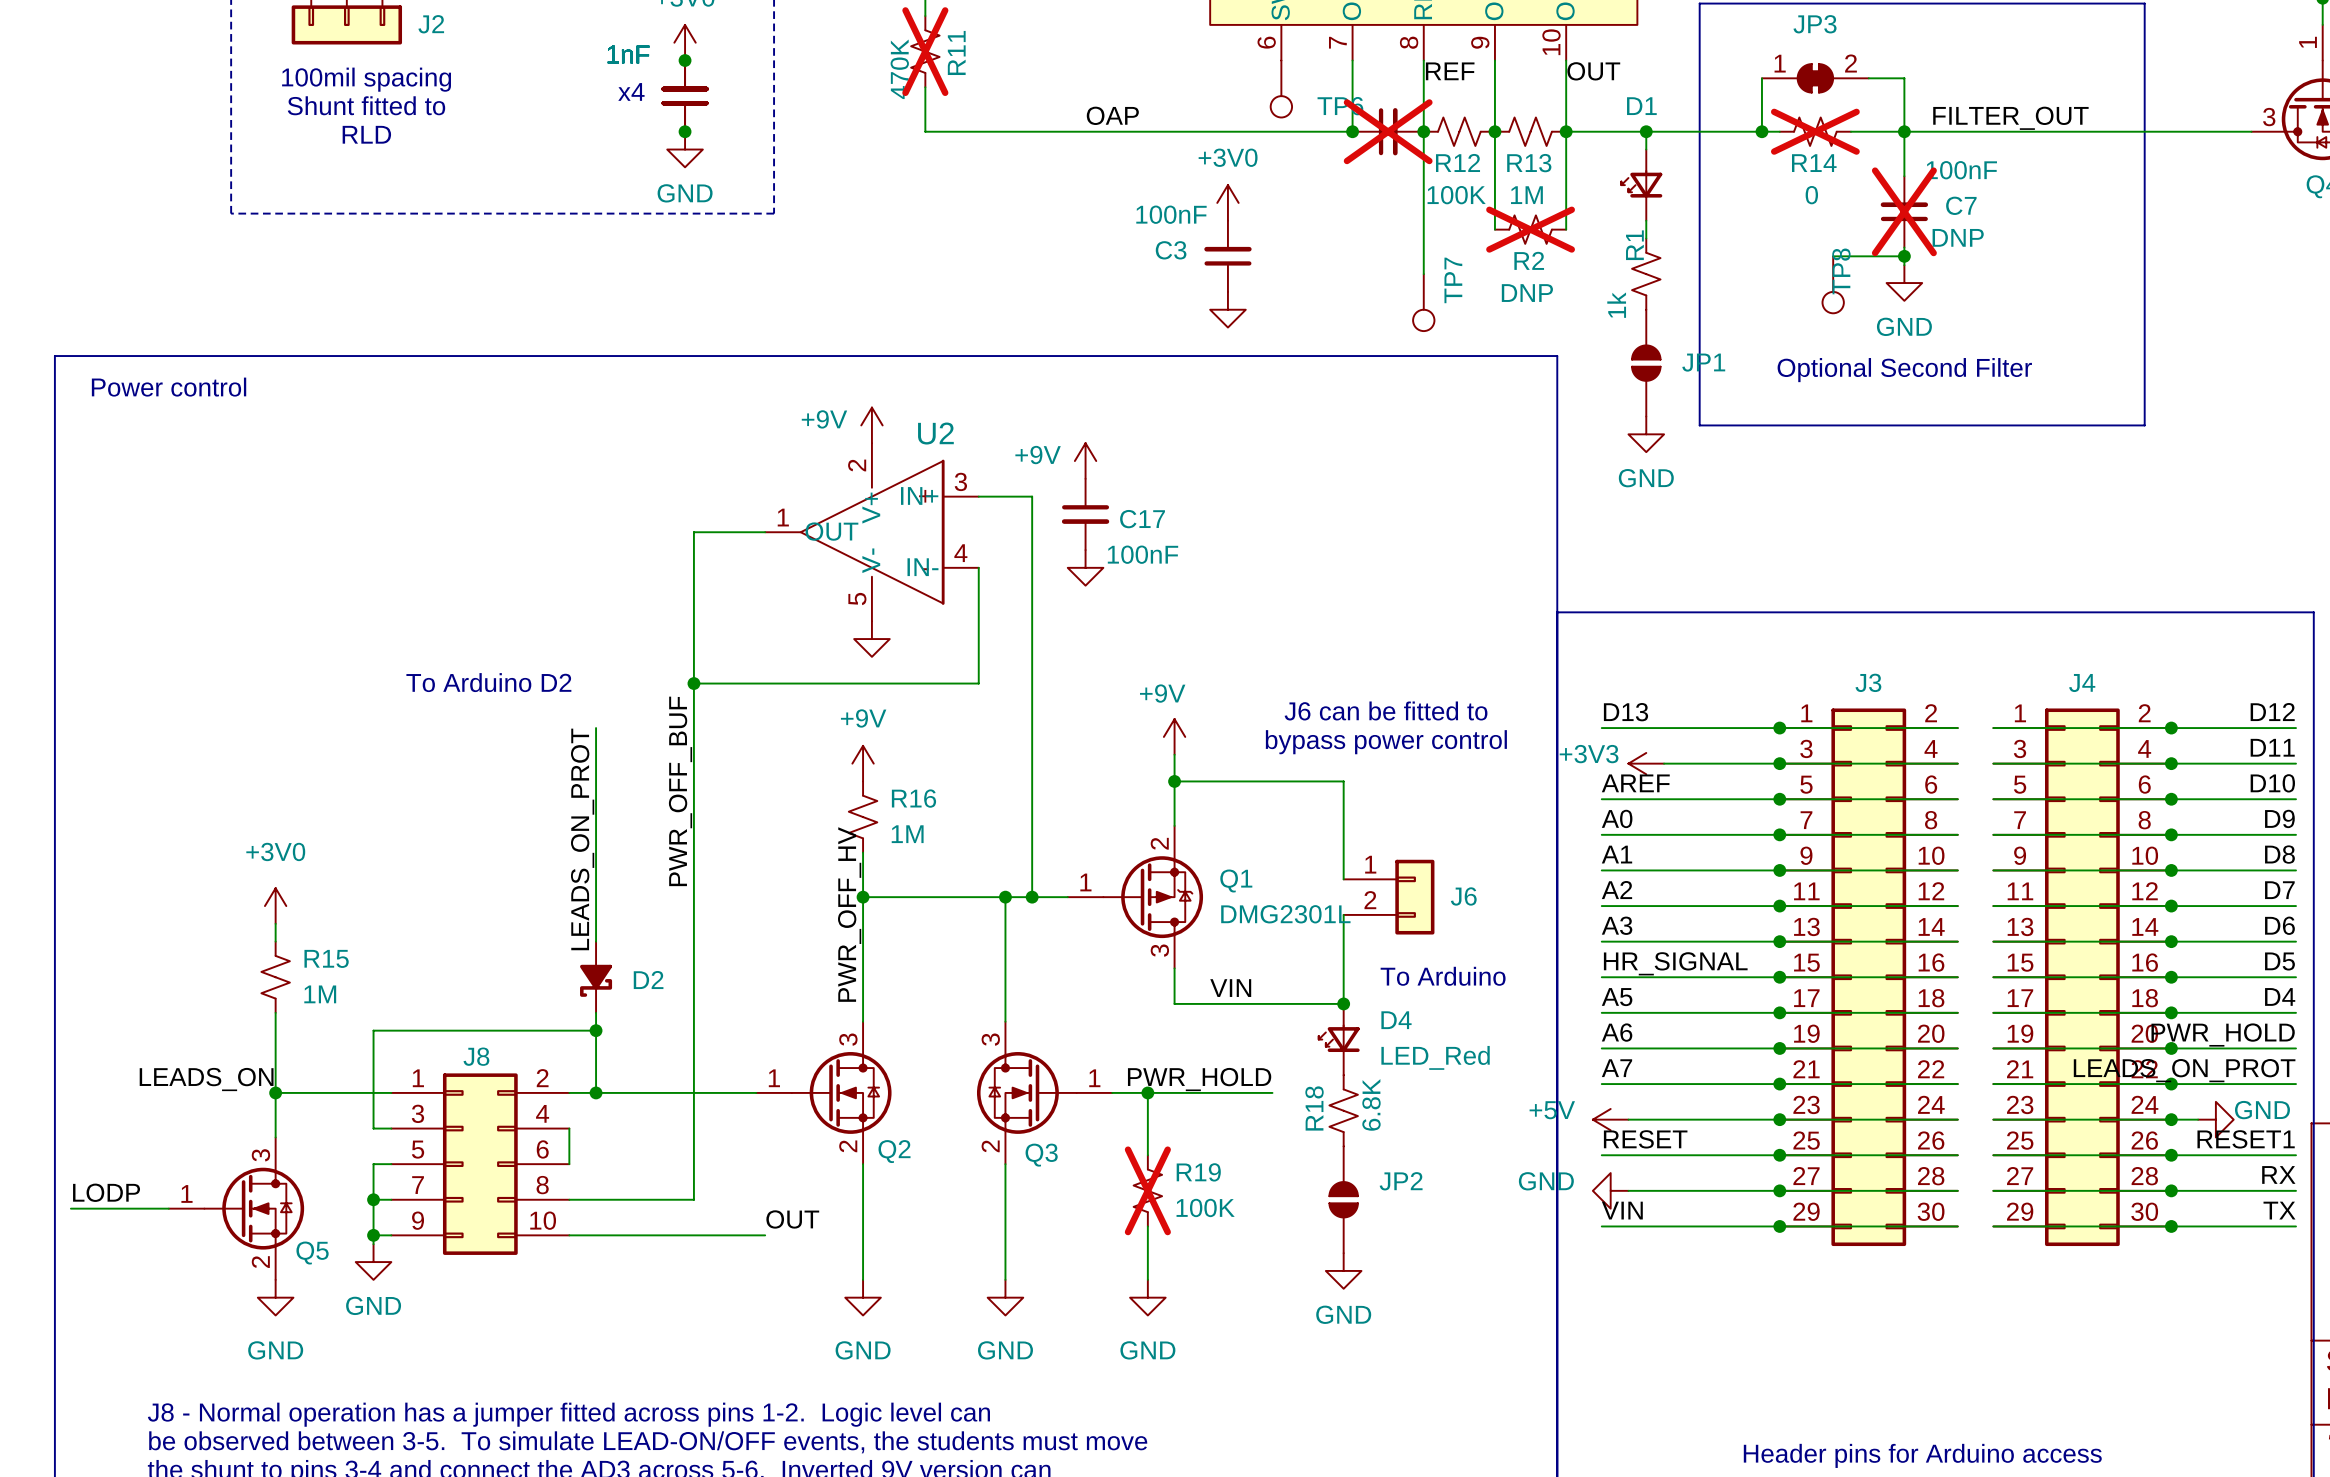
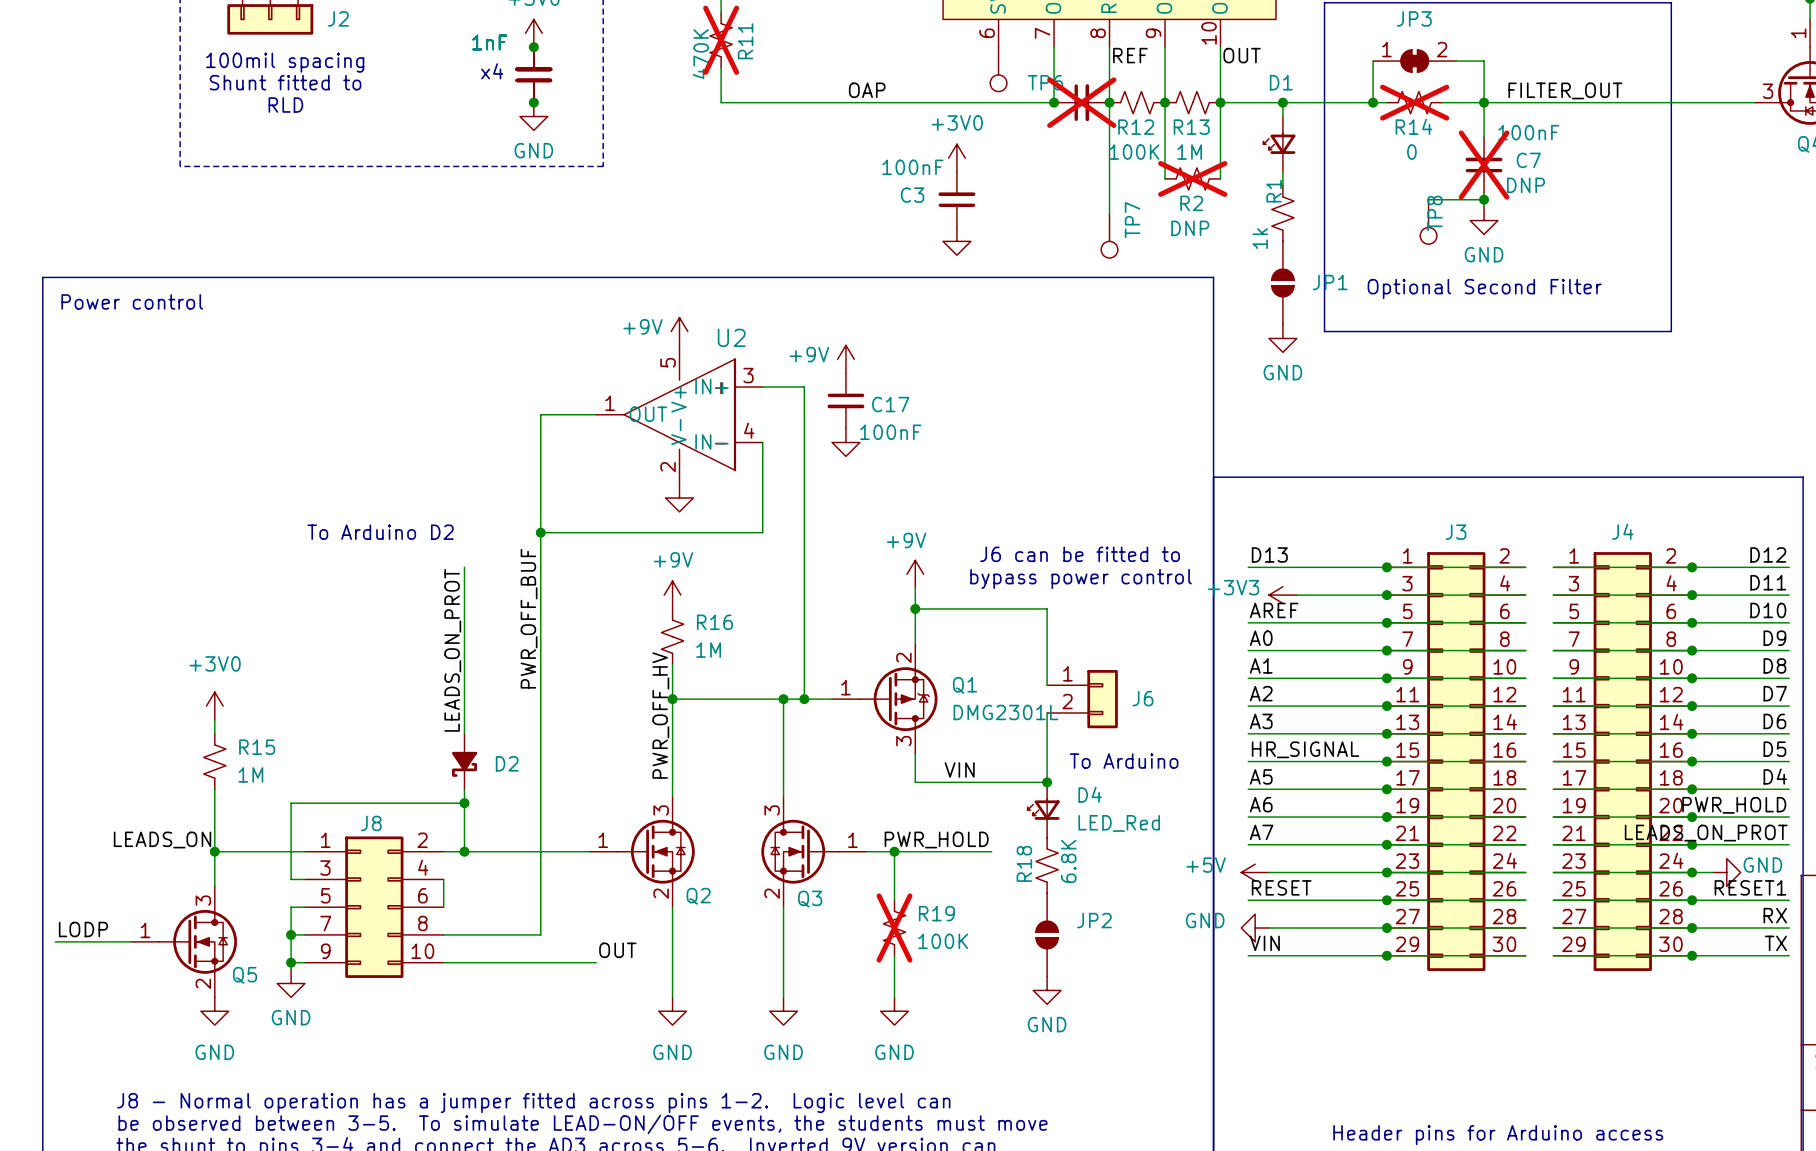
U2 pin number: 2 (857, 465) -> 5 (668, 362)
U2 pin number: 5 (857, 599) -> 2 (668, 467)

